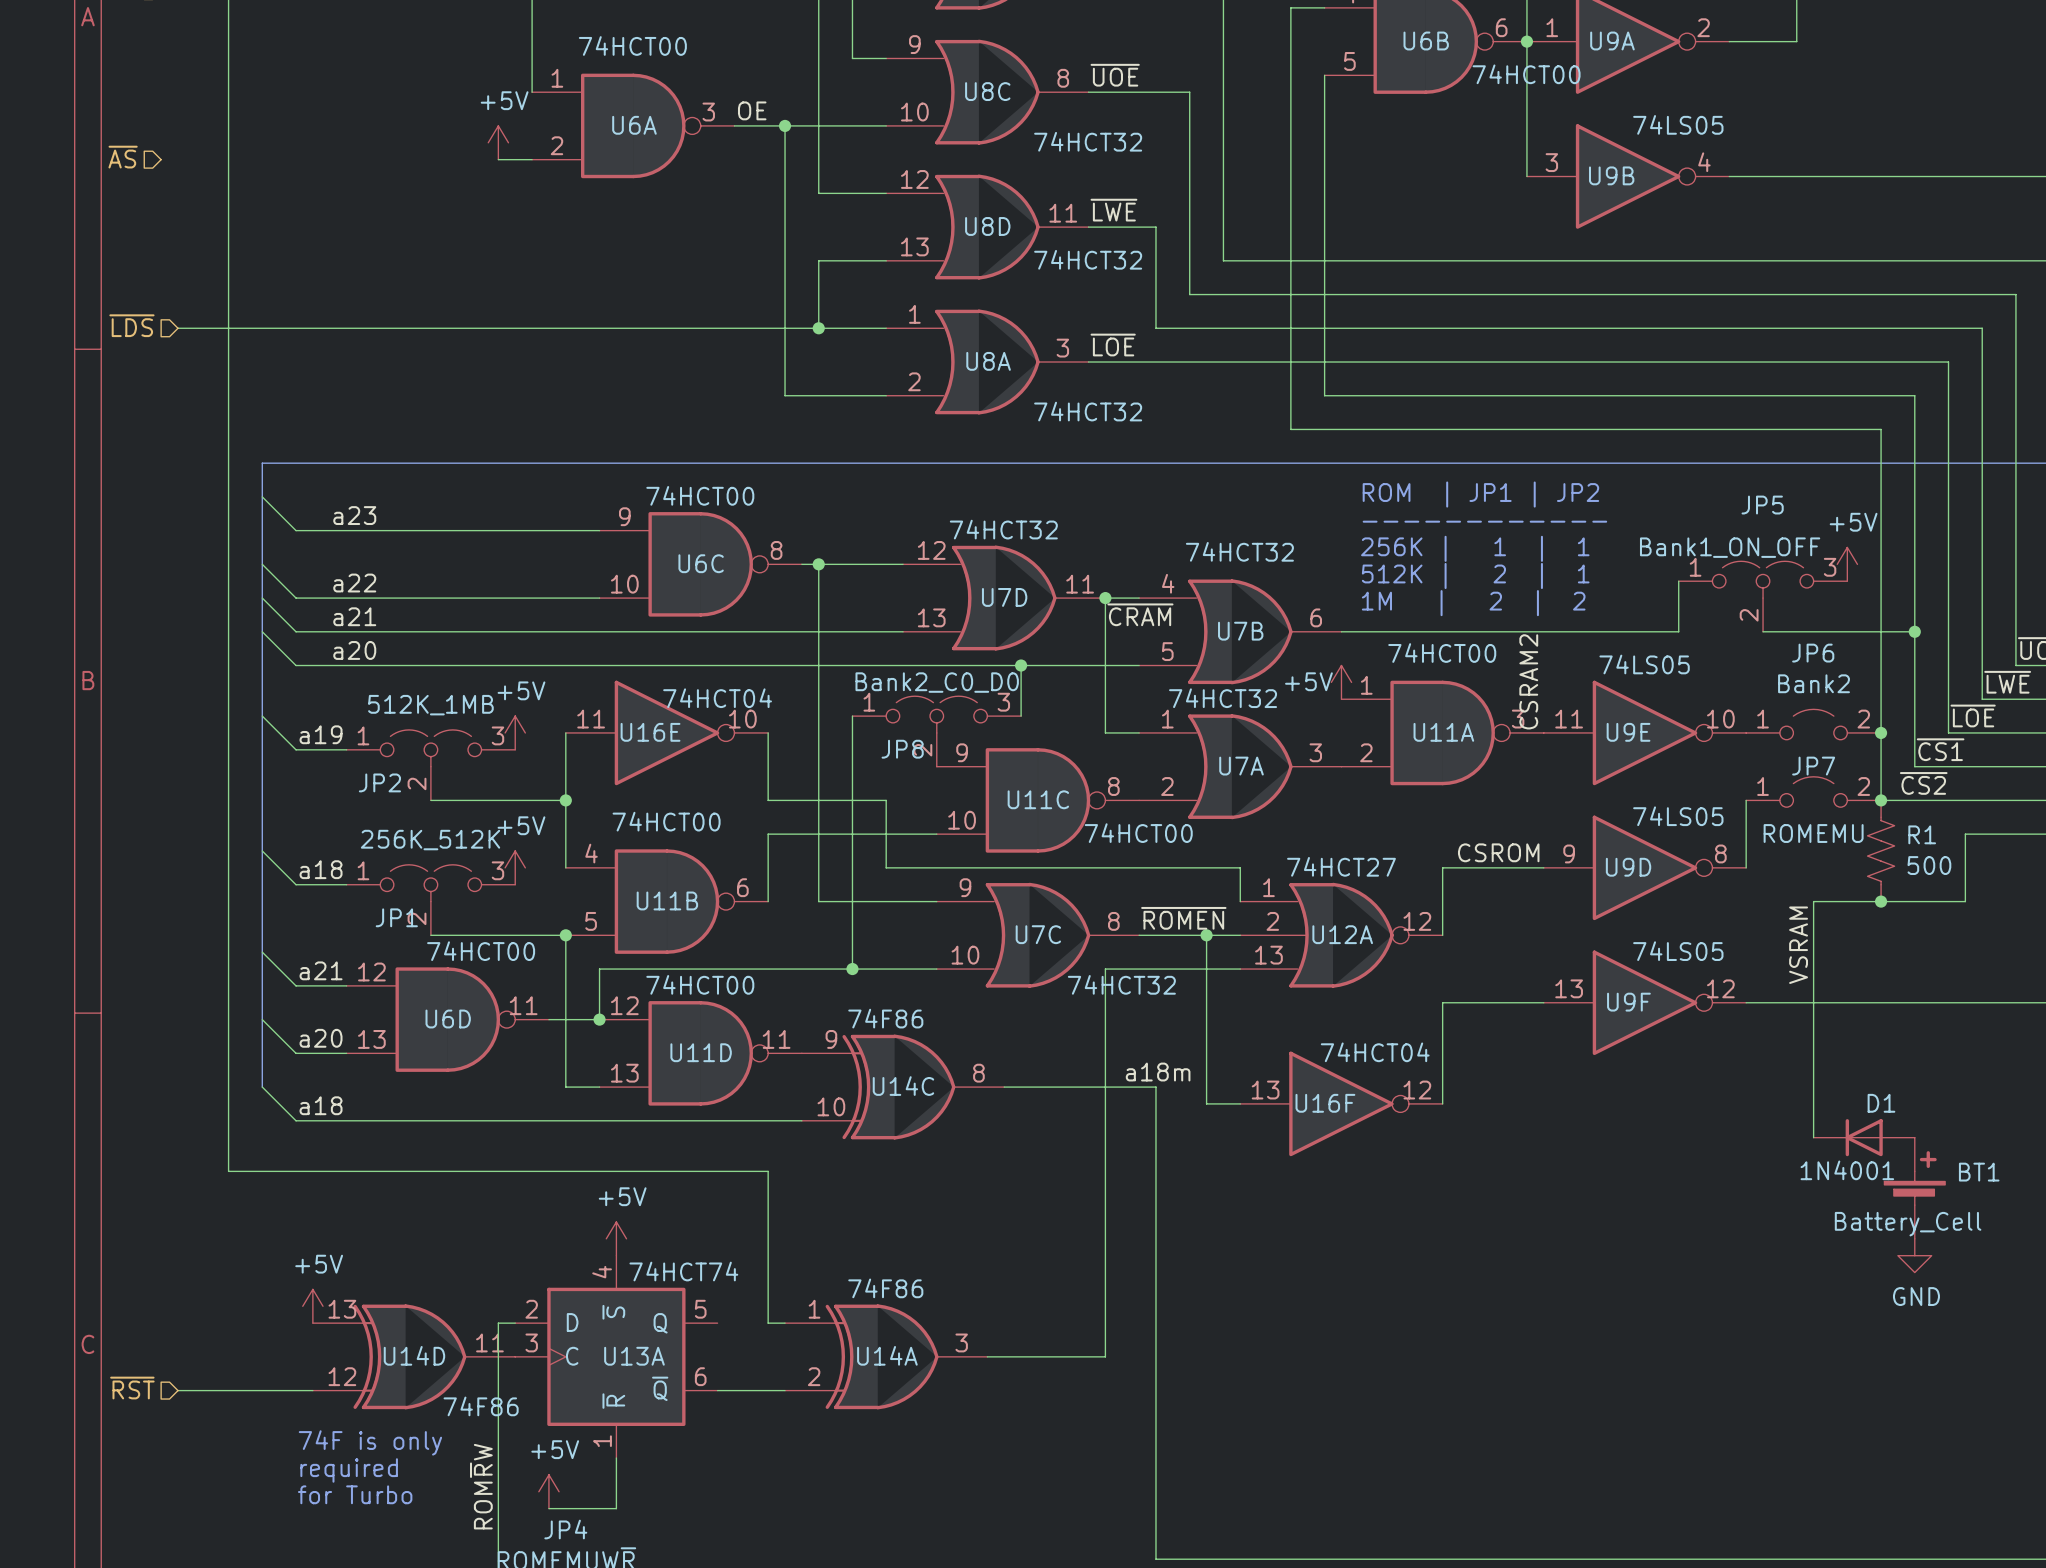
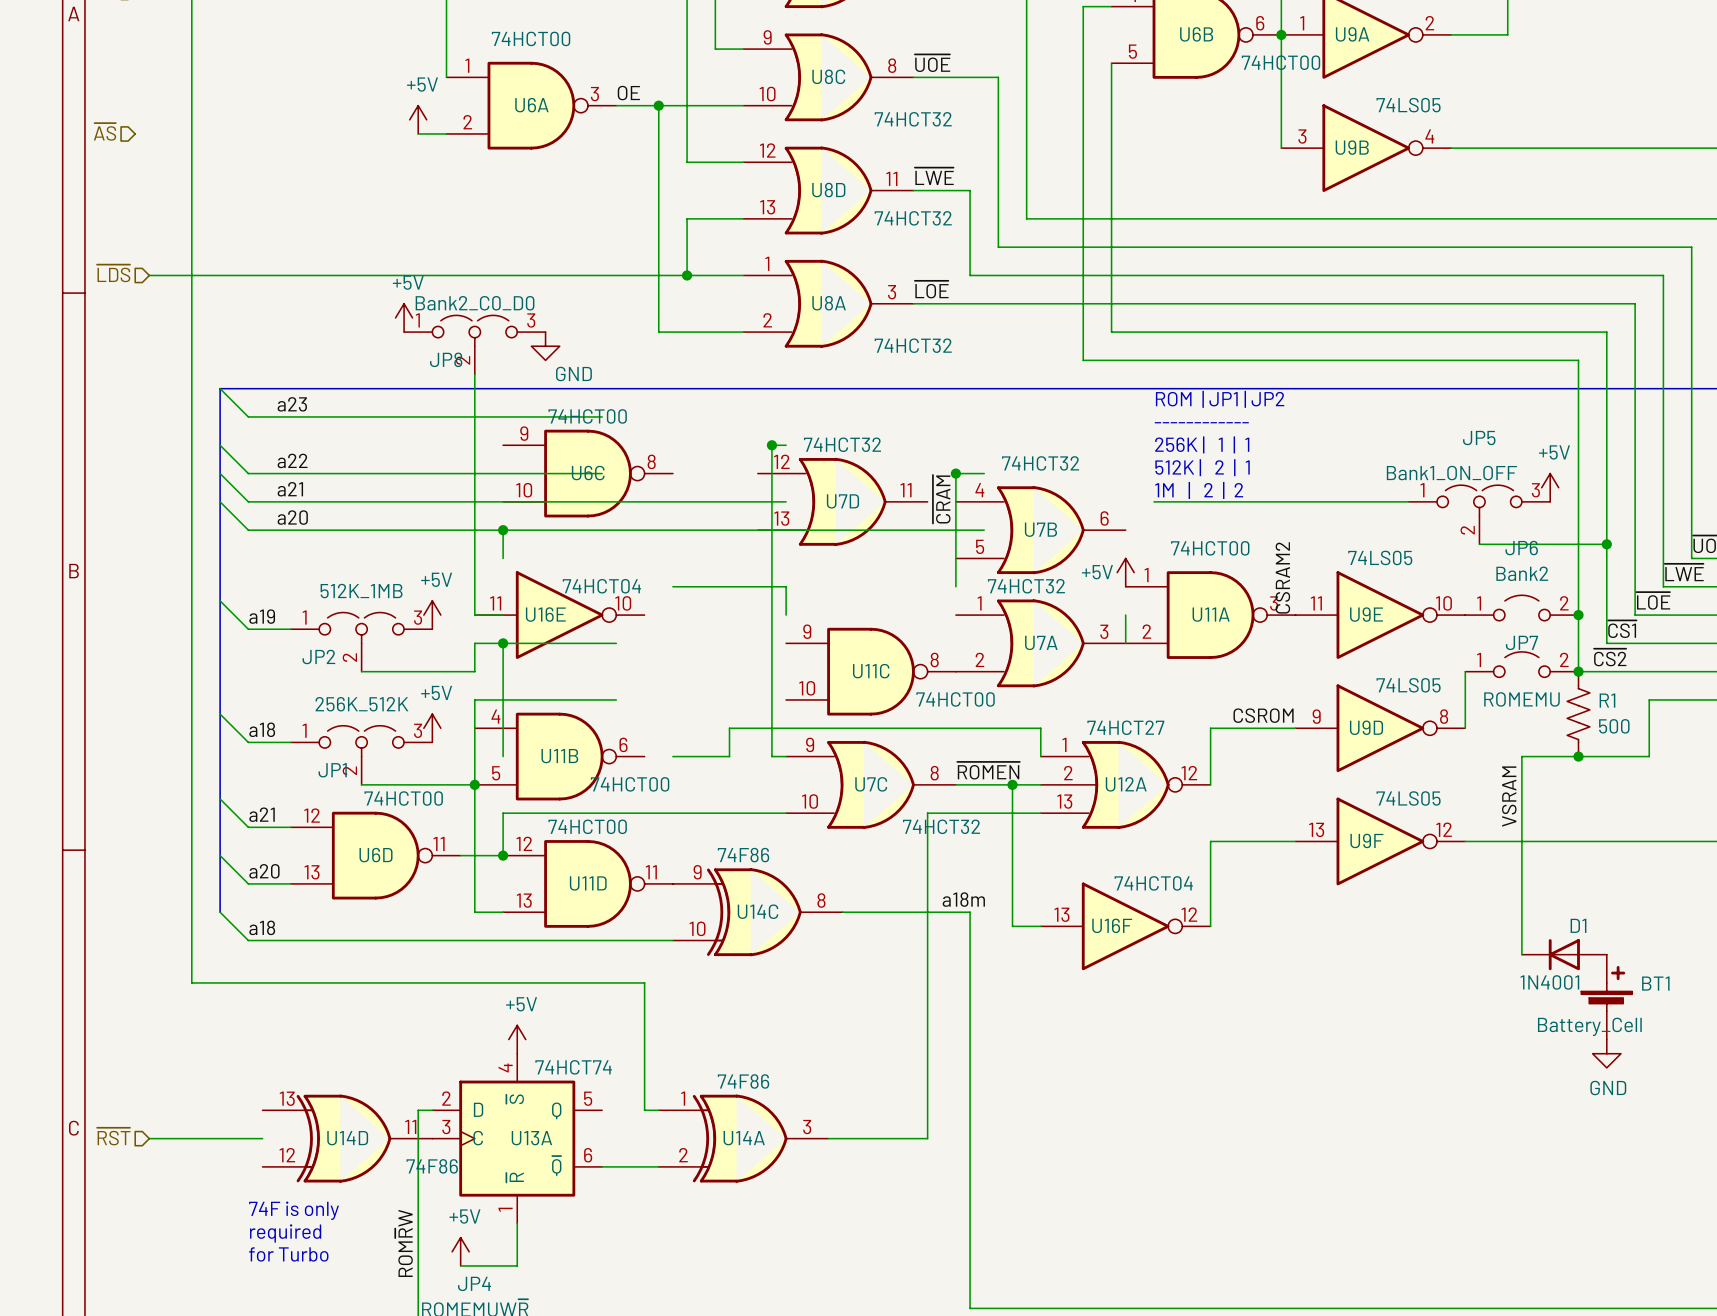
power symbol: none -> +5V (404, 317)
power symbol: none -> GND (545, 346)
wire: none -> (474, 374) (474, 615) (503, 615)
wire: none -> (220, 388) (248, 416) (602, 416)
text position: ROM | JP1 | JP2 (1480, 494) -> ROM | JP1 | JP2 (1220, 399)
wire: (262, 496) (296, 530) (599, 530) -> none
label position: a23 (354, 515) -> a23 (292, 404)
text position: ------------ (1484, 521) -> ------------ (1201, 422)
wire: none -> (220, 445) (248, 473) (602, 473)
junction: none -> (771, 445)
wire: none -> (786, 445) (771, 445) (771, 756)
text position: 256K | 1 | 1 (1475, 548) -> 256K | 1 | 1 (1202, 444)
label: none -> a22 (292, 460)
wire: (801, 564) (903, 564) -> none
wire: (818, 564) (818, 901) -> (672, 756) (687, 756)
junction: (818, 564) -> none
wire: none -> (984, 473) (955, 473) (955, 586)
power symbol position: +5V (1847, 564) -> +5V (1550, 487)
text position: 512K | 2 | 1 (1475, 575) -> 512K | 2 | 1 (1202, 467)
wire: (1678, 581) (1678, 631) (1341, 631) -> none
label: a22 (354, 583) -> a21 (290, 489)
JP5 position: (1763, 596) -> (1479, 514)
wire: none -> (503, 501) (786, 501)
junction position: (1105, 598) -> (955, 473)
wire: (1139, 598) (1105, 598) (1105, 732) (1139, 732) -> none
wire: none -> (1154, 501) (1408, 501)
text position: 1M | 2 | 2 (1473, 603) -> 1M | 2 | 2 (1199, 490)
label rotation: 0° (1140, 614) -> 90° counterclockwise (941, 499)
label: a21 (354, 616) -> a20 (292, 517)
wire: (262, 631) (296, 665) (1139, 665) -> none
wire: none -> (503, 530) (503, 558)
junction: none -> (503, 530)
wire: none -> (757, 530) (984, 530)
wire: (1763, 631) (1914, 631) -> (1479, 544) (1606, 544)
junction position: (1914, 631) -> (1606, 544)
label: a20 (354, 650) -> none
wire: (1021, 665) (1021, 716) -> none
junction: (1021, 665) -> none
wire: none -> (672, 586) (786, 586) (786, 615)
wire: (852, 716) (852, 969) -> none
JP8 position: (936, 731) -> (474, 344)
wire: (565, 732) (565, 766) -> (616, 643) (474, 643)
wire: (768, 732) (768, 800) (886, 800) (886, 867) -> none
wire: none -> (1125, 615) (1125, 643)
wire: none -> (503, 643) (503, 756)
wire: (565, 800) (565, 834) -> (616, 699) (474, 699)
junction position: (565, 800) -> (503, 643)
U11B value position: 74HCT00 (666, 821) -> 74HCT00 (630, 784)
wire: (936, 834) (768, 834) (768, 901) -> none
wire: none -> (474, 728) (474, 784)
wire: (869, 901) (919, 901) -> (729, 756) (729, 728) (743, 728)
junction: (852, 969) -> none
power symbol: +5V (312, 1306) -> none
hierarchical label position: ~{RST} (132, 1388) -> ~{RST} (113, 1136)
wire: (177, 1390) (312, 1390) -> (149, 1138) (262, 1138)
U14D value position: 74F86 (481, 1406) -> 74F86 (432, 1166)

